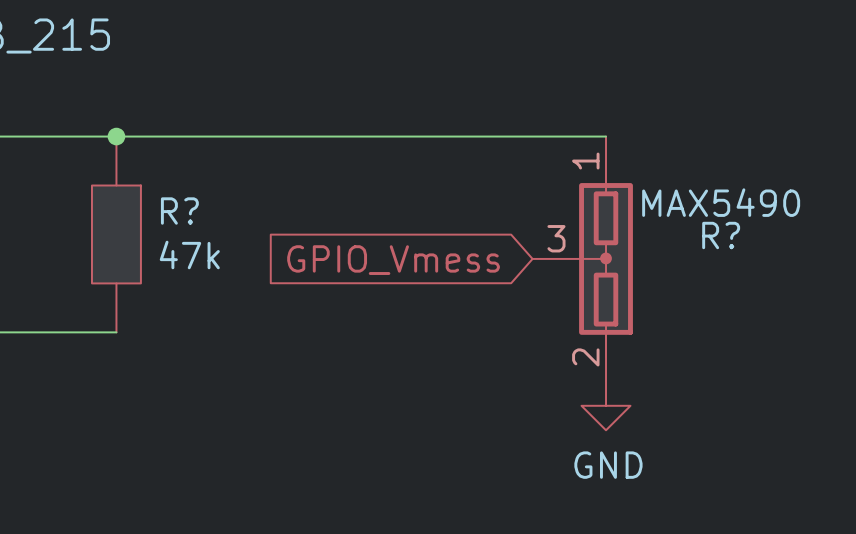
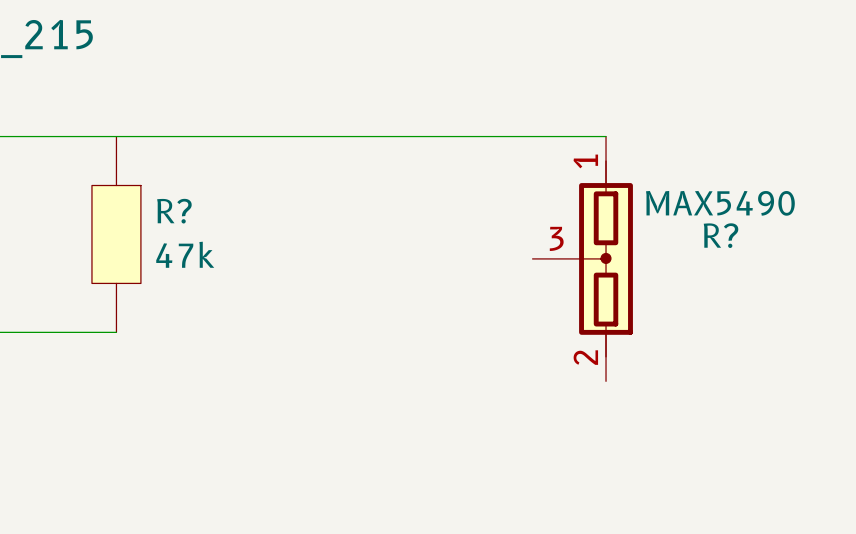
junction: (116, 136) -> none
global label: GPIO_Vmess (393, 260) -> none
power symbol: GND (606, 405) -> none

